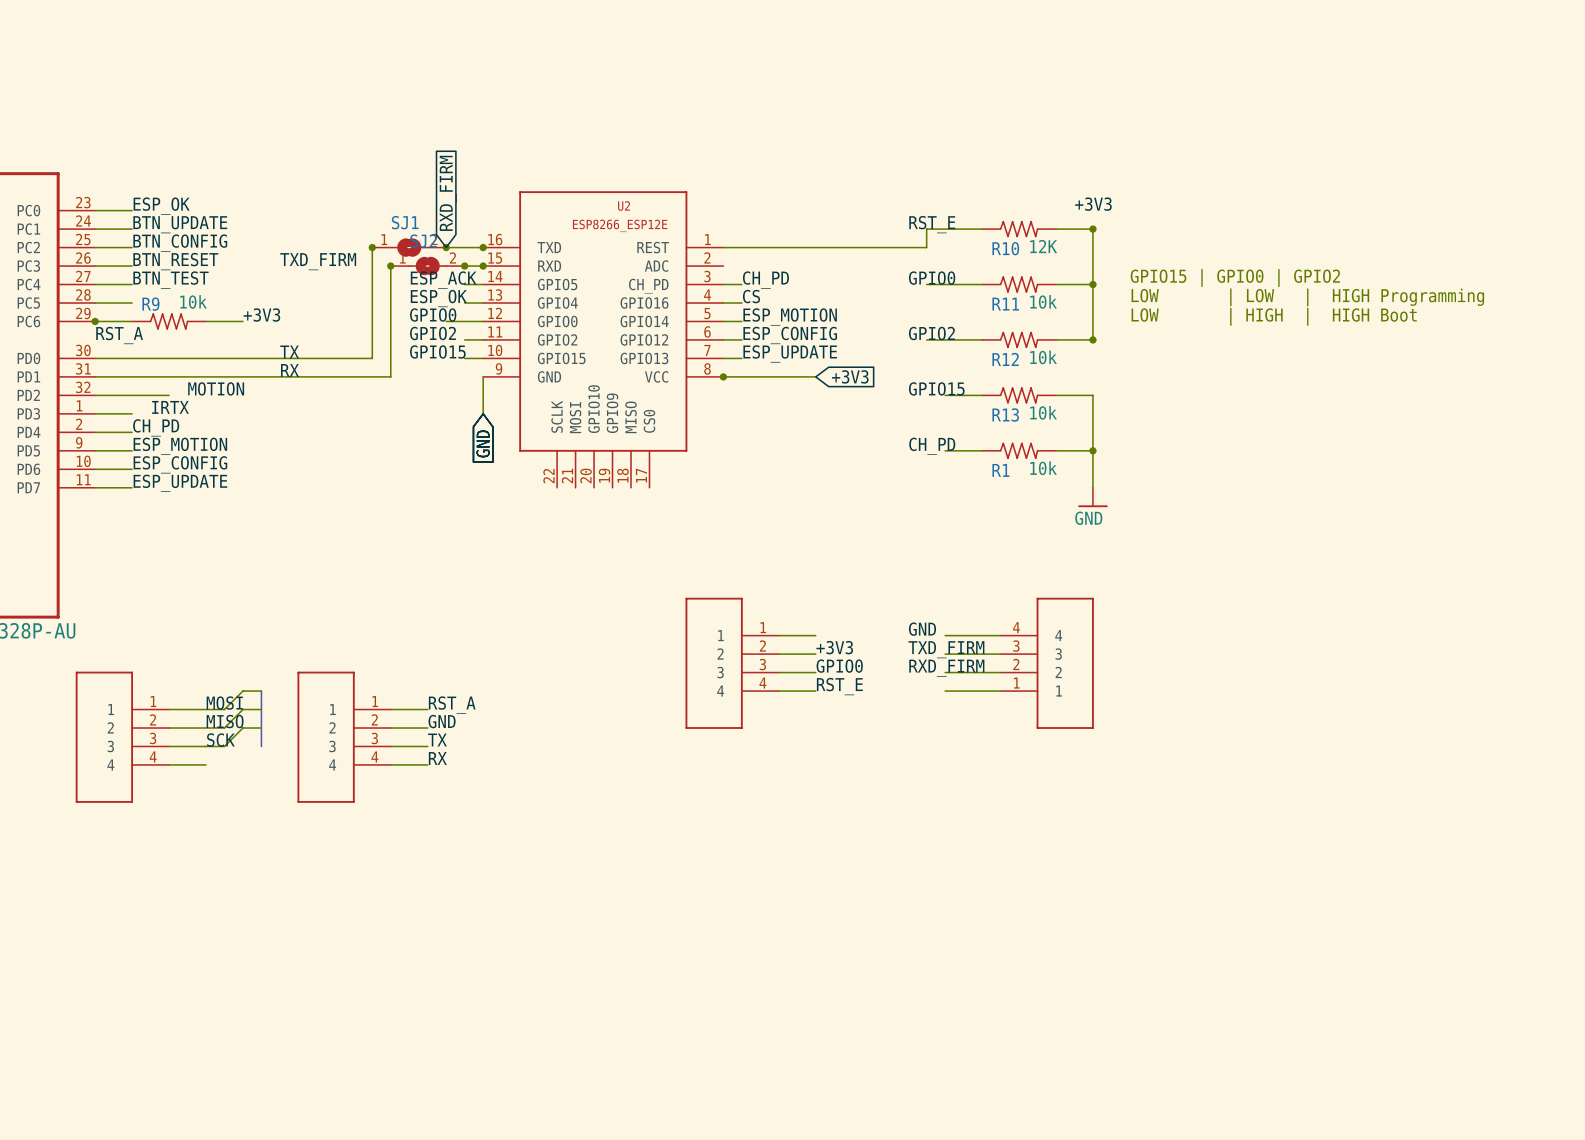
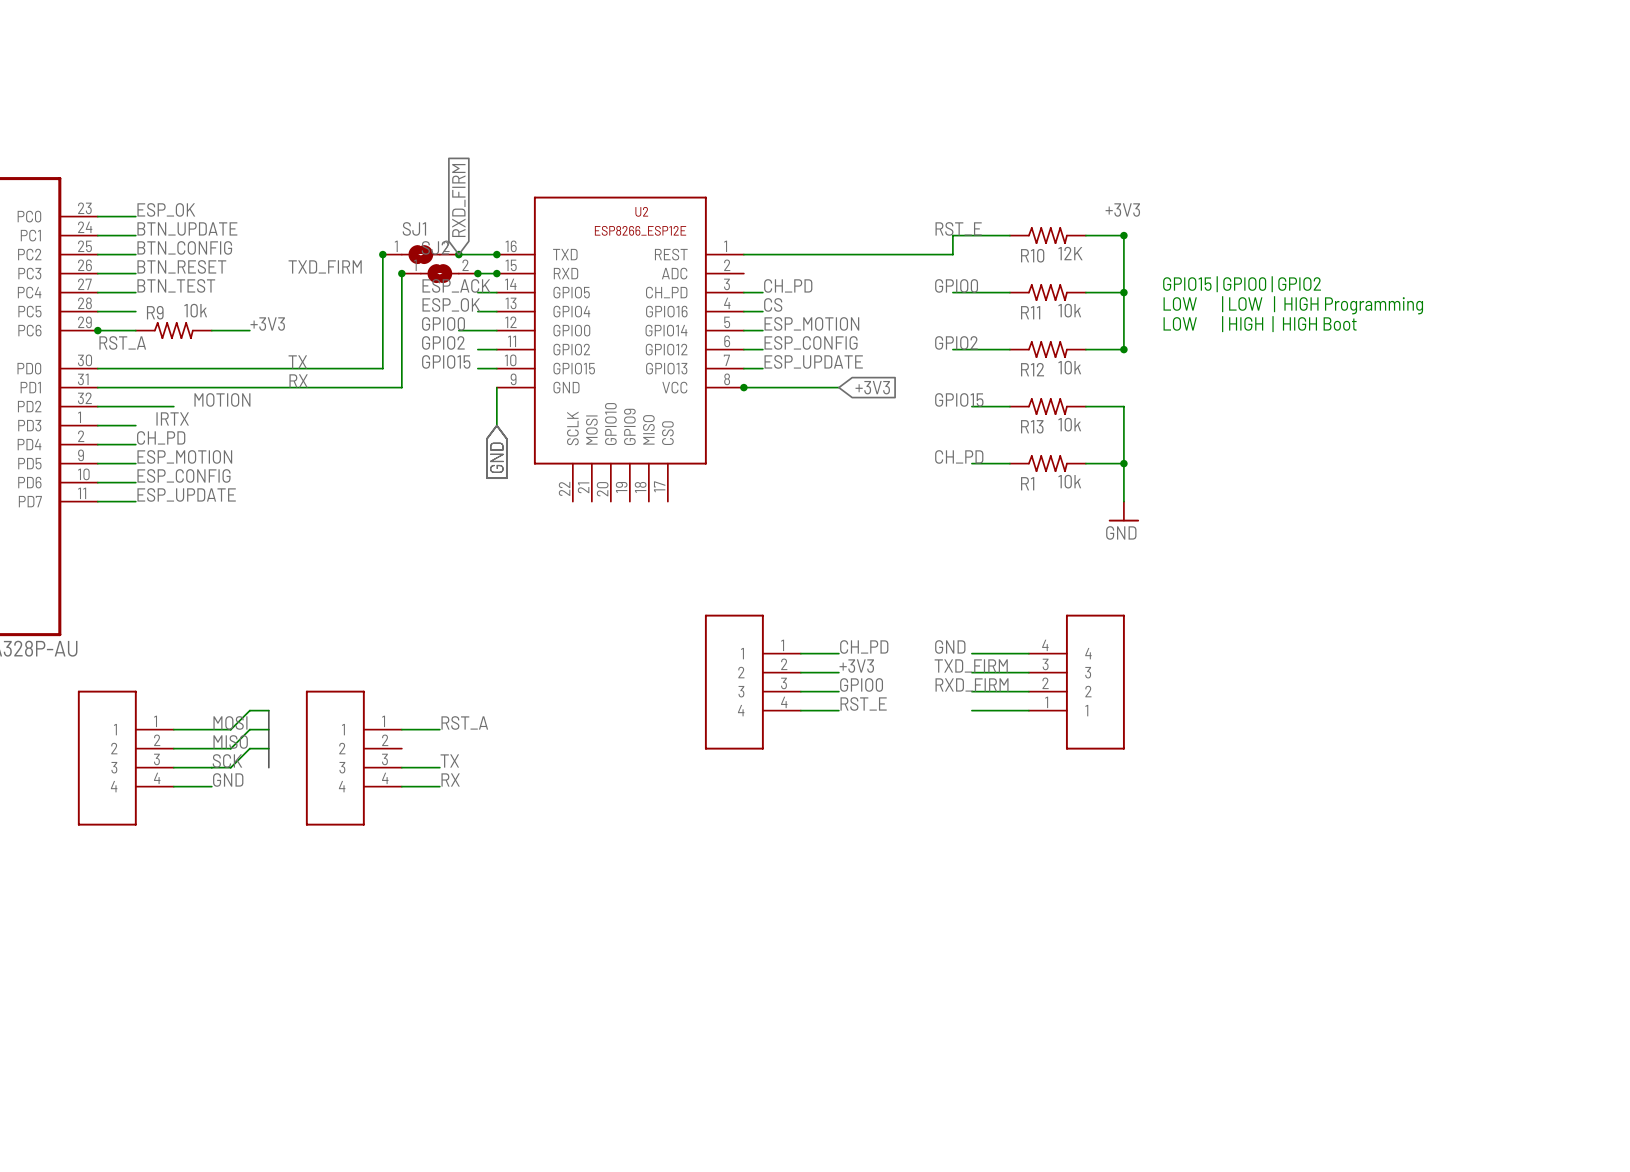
label: none -> CH_PD (864, 646)
label: GND (442, 721) -> none
wire: (390, 728) (427, 728) -> none
label: none -> GND (228, 779)

